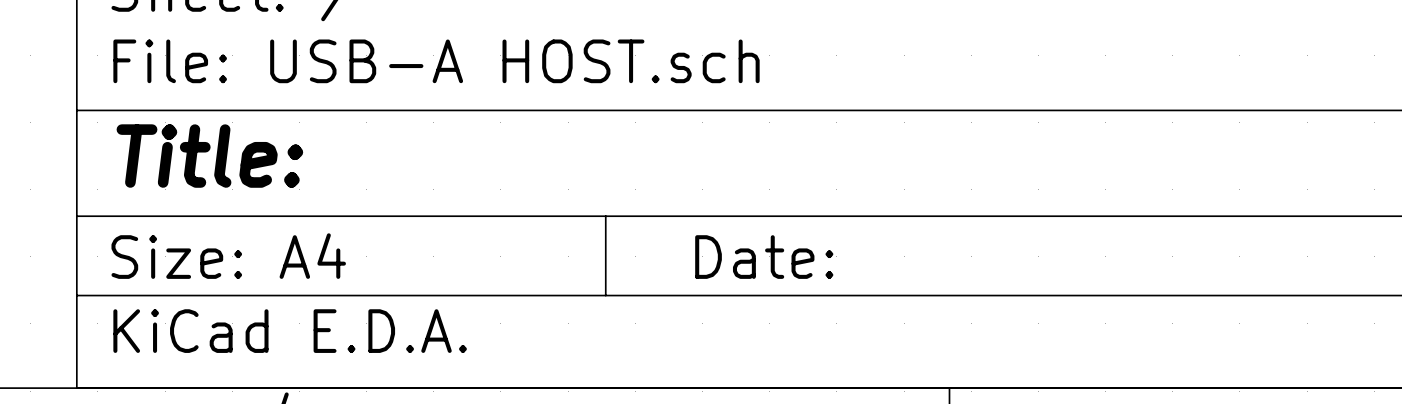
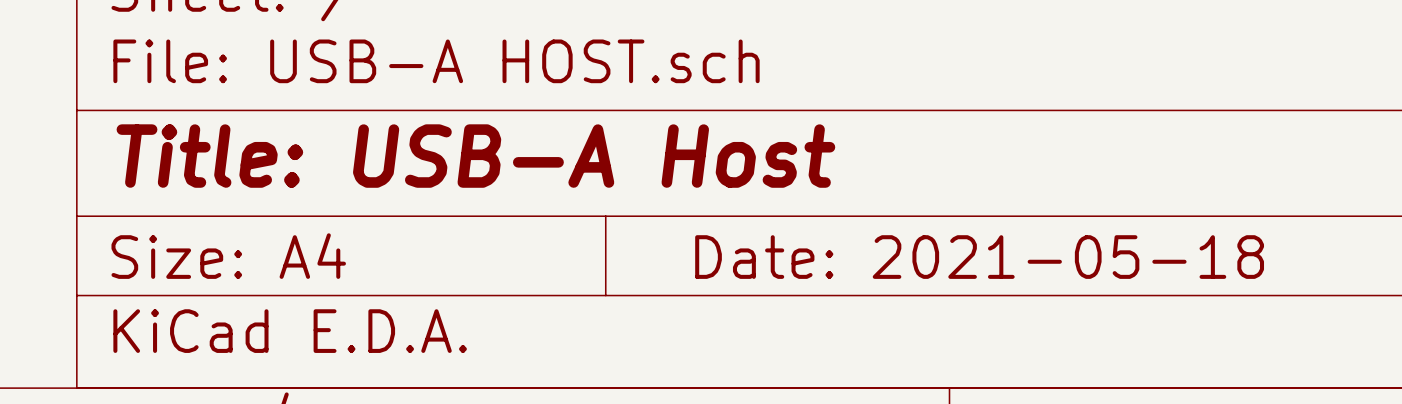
title block: Title: (209, 156) -> Title: USB-A Host (475, 156)
title block: Date: (764, 257) -> Date: 2021-05-18 (979, 257)

